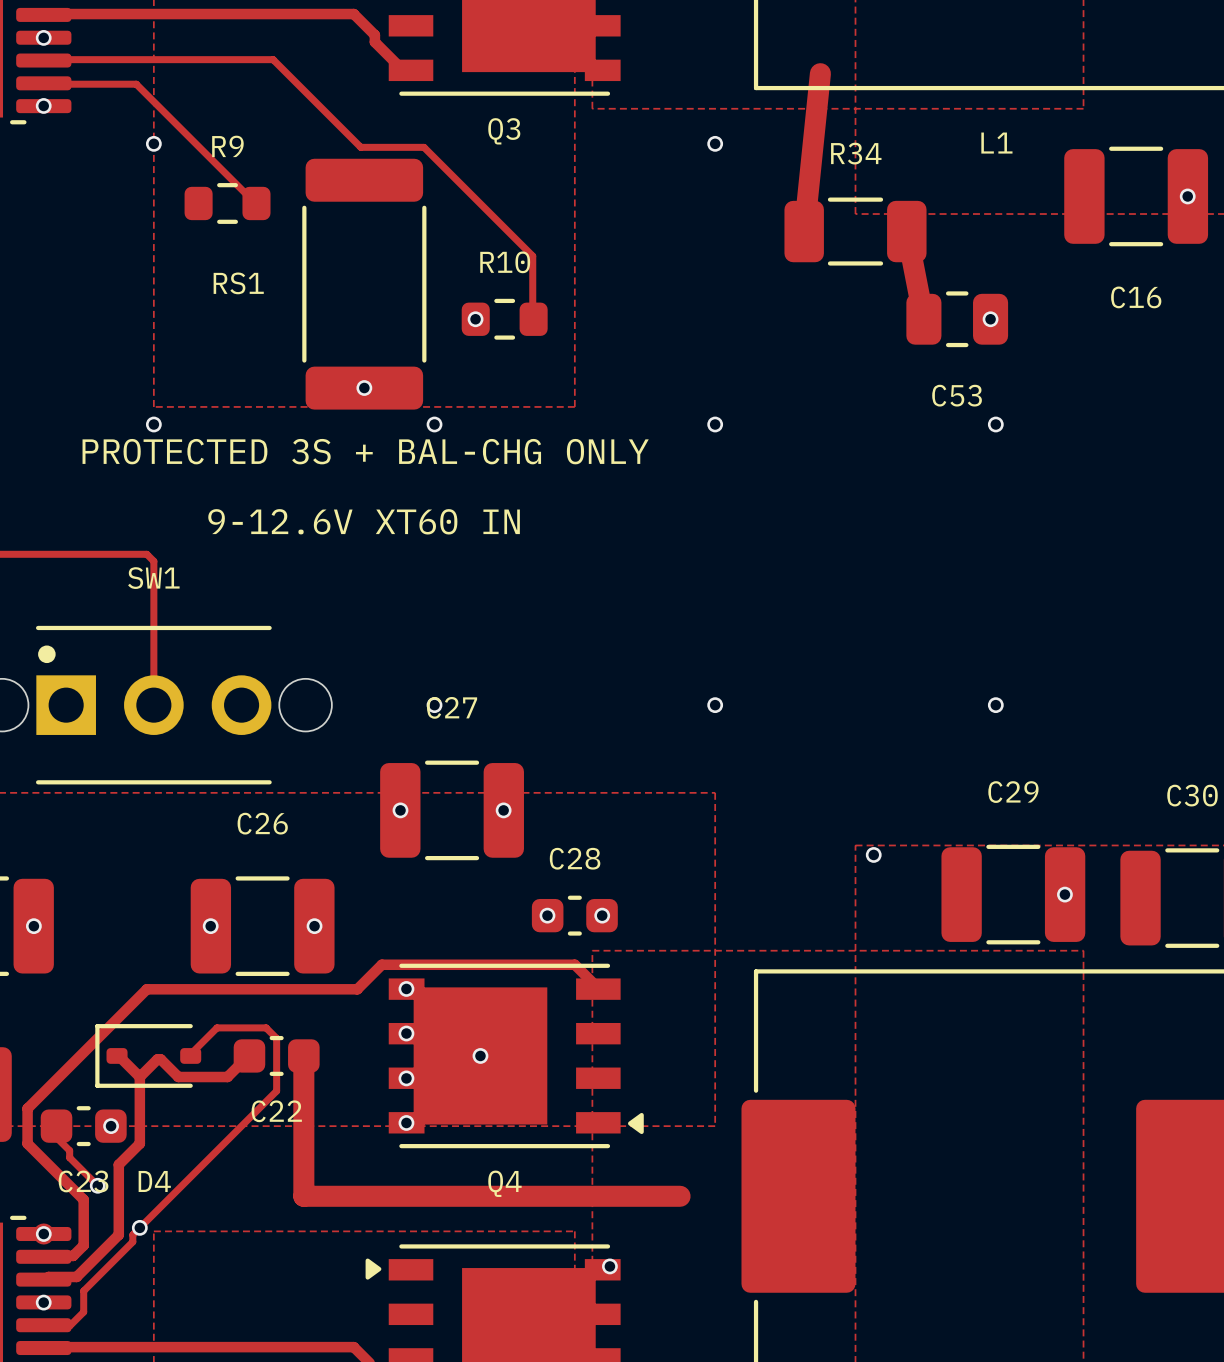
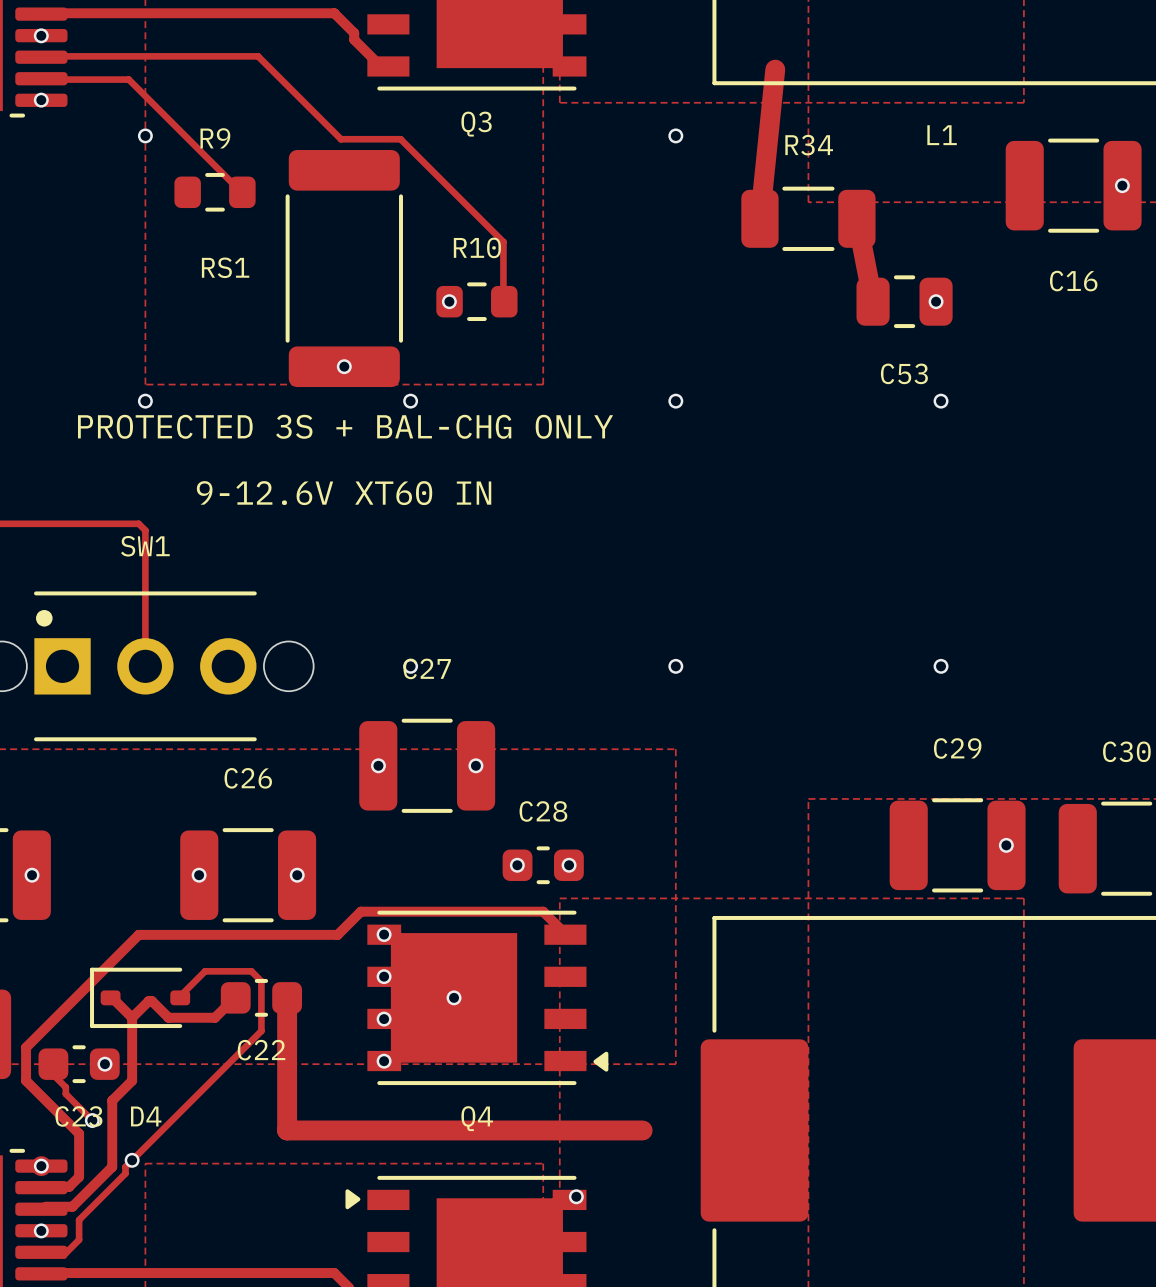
via: (873, 854) -> none

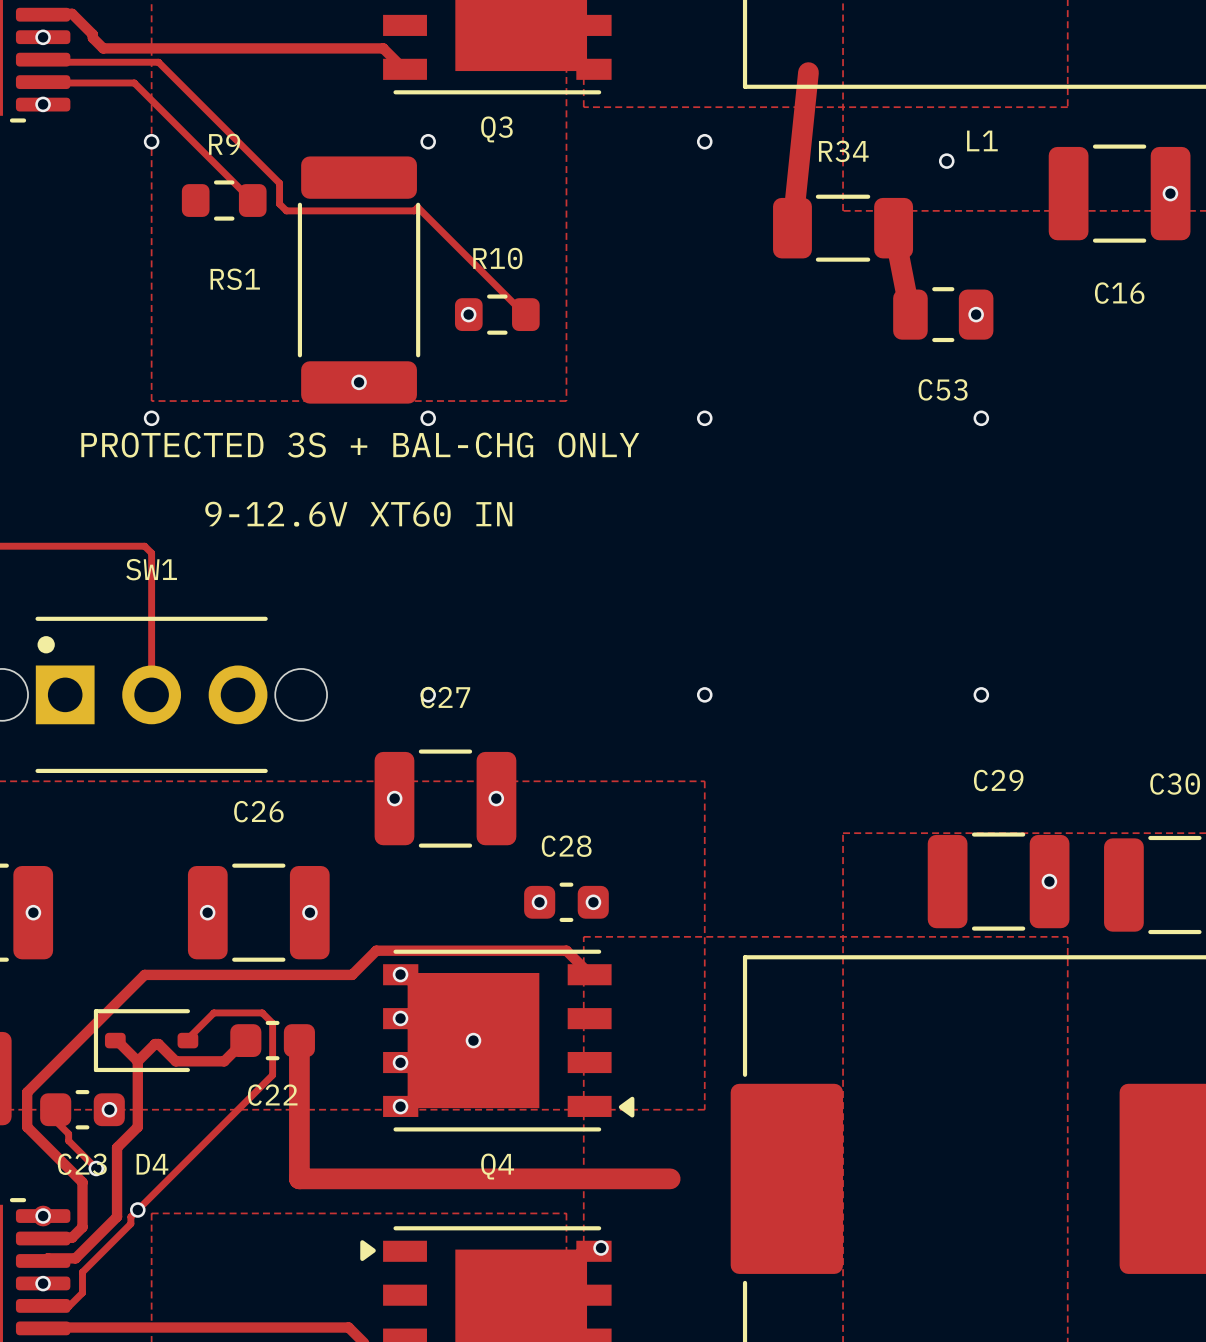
track: (69, 13) (334, 13) (354, 33) (354, 39) (380, 66) (387, 66) -> (72, 13) (92, 34) (92, 38) (103, 48) (383, 48) (403, 69)
track: (42, 56) (258, 56) (340, 139) (400, 139) (503, 242) (503, 301) -> (44, 58) (47, 62) (158, 62) (279, 183) (279, 203) (286, 210) (414, 210) (417, 207) (524, 314)
via: none -> (428, 141)
via: none -> (946, 161)

